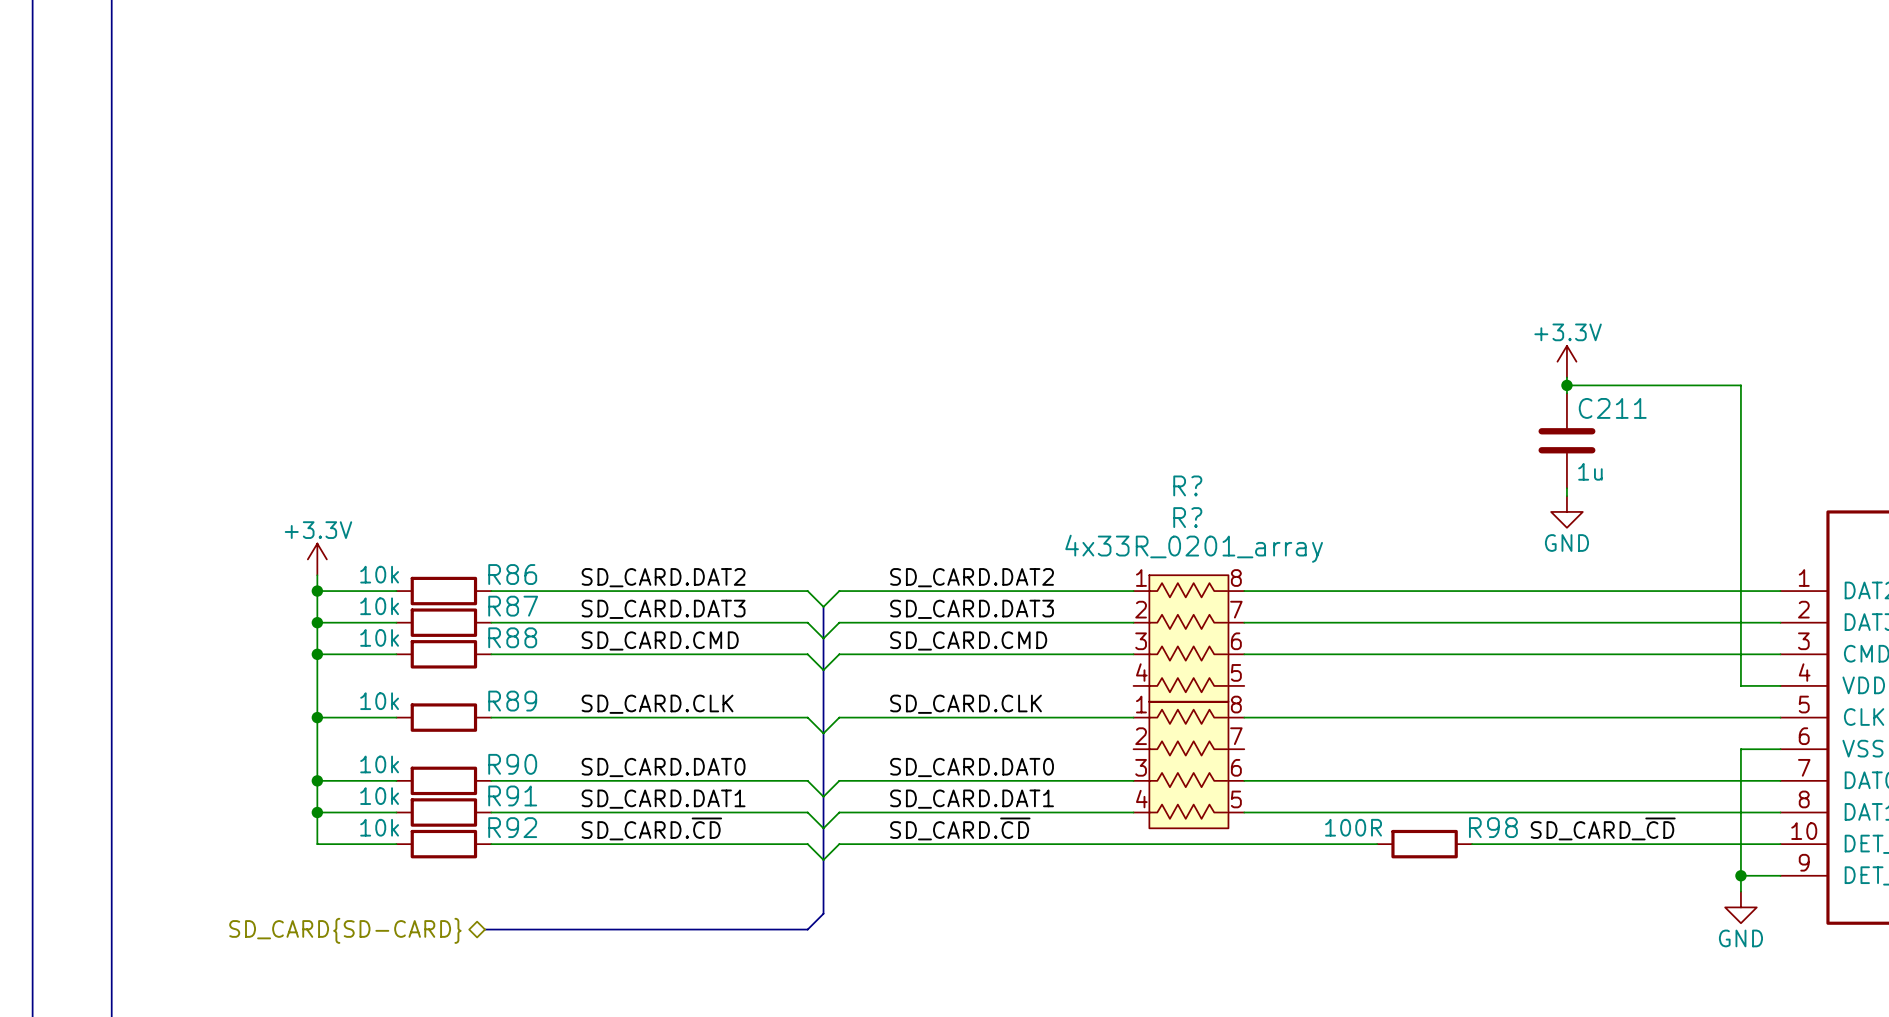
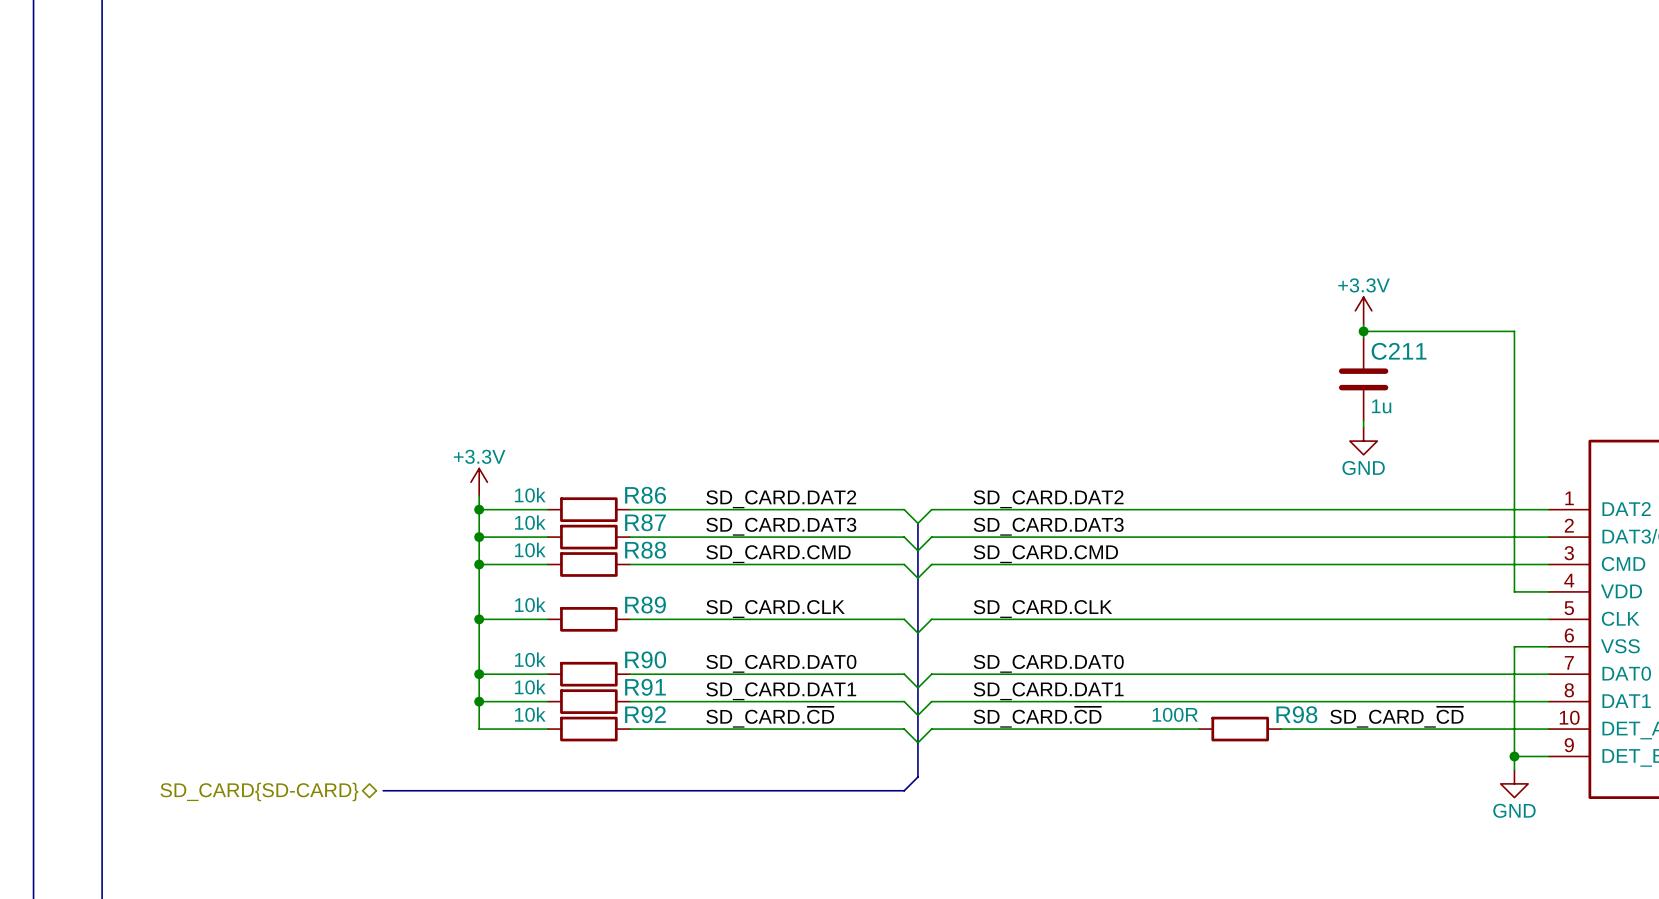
power symbol position: +3.3V (317, 559) -> +3.3V (479, 482)
wire: (317, 575) (317, 844) (396, 844) -> none
label: SD_CARD.DAT2 (663, 577) -> none
label position: SD_CARD.DAT2 (972, 577) -> SD_CARD.DAT2 (781, 499)
label: none -> SD_CARD.DAT2 (1048, 499)
wire: (317, 591) (396, 591) -> none
junction: (317, 591) -> none
R86 position: (443, 591) -> (588, 509)
wire: (491, 591) (546, 591) -> none
junction: none -> (479, 509)
wire: (625, 591) (720, 591) -> none
wire: (807, 591) (823, 606) (839, 591) -> (705, 509) (732, 509)
wire: (1037, 591) (1068, 591) -> (904, 509) (917, 523) (931, 509)
bus: (823, 606) (823, 913) (807, 929) (485, 929) -> none
bus: none -> (917, 523) (917, 777) (904, 790) (383, 790)
label: SD_CARD.DAT3 (663, 609) -> none
label position: SD_CARD.DAT3 (972, 609) -> SD_CARD.DAT3 (781, 526)
label: none -> SD_CARD.DAT3 (1048, 526)
wire: (317, 622) (396, 622) -> none
junction: (317, 622) -> none
R87 position: (443, 622) -> (588, 537)
wire: (491, 622) (546, 622) -> none
junction: none -> (479, 537)
wire: (625, 622) (720, 622) -> none
wire: (807, 622) (823, 638) (839, 622) -> (705, 537) (732, 537)
wire: (1037, 622) (1068, 622) -> (904, 537) (917, 550) (931, 537)
R?: 4x33R_0201_array (1188, 638) -> none
label: SD_CARD.CMD (660, 640) -> none
label position: SD_CARD.CMD (968, 640) -> SD_CARD.CMD (778, 554)
label: none -> SD_CARD.CMD (1045, 554)
wire: (317, 654) (396, 654) -> none
junction: (317, 654) -> none
R88 position: (443, 654) -> (588, 564)
wire: (491, 654) (546, 654) -> none
junction: none -> (479, 564)
wire: (625, 654) (720, 654) -> none
wire: (807, 654) (823, 670) (839, 654) -> (705, 564) (732, 564)
wire: (1037, 654) (1068, 654) -> (904, 564) (917, 578) (931, 564)
label: SD_CARD.CLK (657, 704) -> none
label position: SD_CARD.CLK (966, 704) -> SD_CARD.CLK (775, 608)
label: none -> SD_CARD.CLK (1042, 608)
wire: (317, 717) (396, 717) -> none
junction: (317, 717) -> none
R89 position: (443, 717) -> (588, 619)
wire: (491, 717) (546, 717) -> none
junction: none -> (479, 619)
wire: (625, 717) (720, 717) -> none
wire: (807, 717) (823, 733) (839, 717) -> (705, 619) (732, 619)
wire: (1037, 717) (1068, 717) -> (904, 619) (917, 633) (931, 619)
R?: (1188, 765) -> none
label: SD_CARD.DAT0 (663, 767) -> none
label position: SD_CARD.DAT0 (972, 767) -> SD_CARD.DAT0 (781, 663)
label: none -> SD_CARD.DAT0 (1048, 663)
wire: (317, 780) (396, 780) -> none
junction: (317, 780) -> none
R90 position: (443, 780) -> (588, 674)
wire: (491, 780) (546, 780) -> none
junction: none -> (479, 674)
wire: (625, 780) (720, 780) -> none
wire: (807, 780) (823, 796) (839, 780) -> (705, 674) (732, 674)
wire: (1037, 780) (1068, 780) -> (904, 674) (917, 687) (931, 674)
label: SD_CARD.DAT1 (663, 799) -> none
label position: SD_CARD.DAT1 (972, 799) -> SD_CARD.DAT1 (781, 691)
label: none -> SD_CARD.DAT1 (1048, 691)
wire: (317, 812) (396, 812) -> none
junction: (317, 812) -> none
R91 position: (443, 812) -> (588, 701)
wire: (491, 812) (546, 812) -> none
junction: none -> (479, 701)
wire: (625, 812) (720, 812) -> none
wire: (807, 812) (823, 828) (839, 812) -> (705, 701) (732, 701)
wire: (1037, 812) (1068, 812) -> (904, 701) (917, 715) (931, 701)
label: SD_CARD.~{CD} (651, 828) -> none
label position: SD_CARD.~{CD} (960, 828) -> SD_CARD.~{CD} (770, 717)
label: none -> SD_CARD.~{CD} (1037, 717)
R92 position: (443, 844) -> (588, 729)
wire: (491, 844) (546, 844) -> (479, 495) (479, 729)
wire: (625, 844) (720, 844) -> none
wire: (807, 844) (823, 859) (839, 844) -> (705, 729) (732, 729)
wire: (1037, 844) (1068, 844) -> (904, 729) (917, 742) (931, 729)
hierarchical label position: SD_CARD{SD-CARD} (345, 930) -> SD_CARD{SD-CARD} (259, 791)

